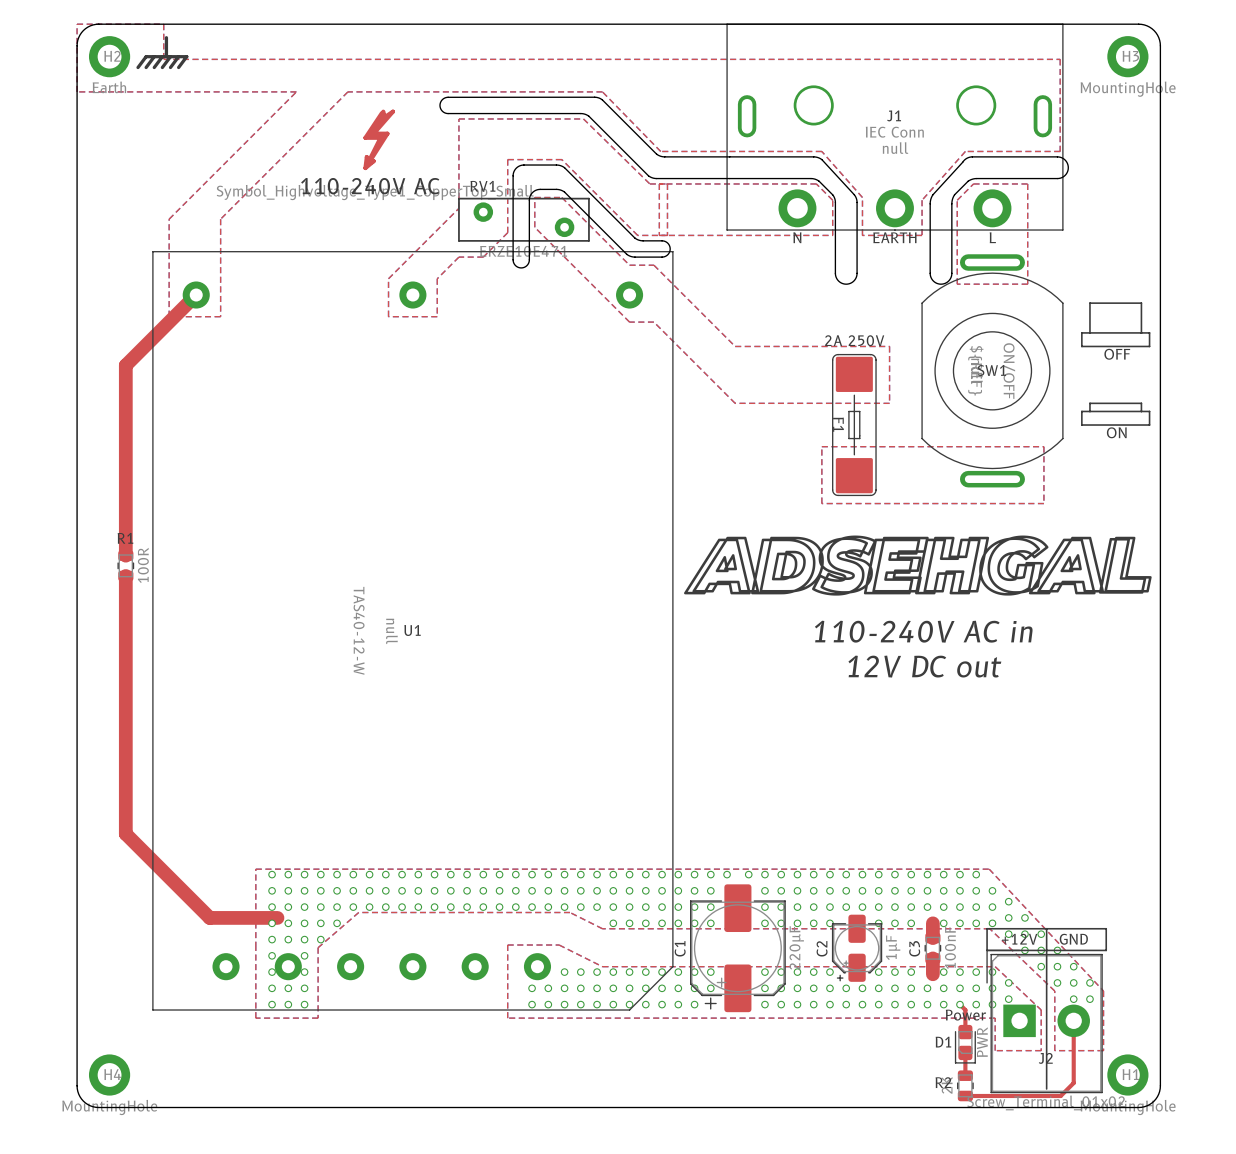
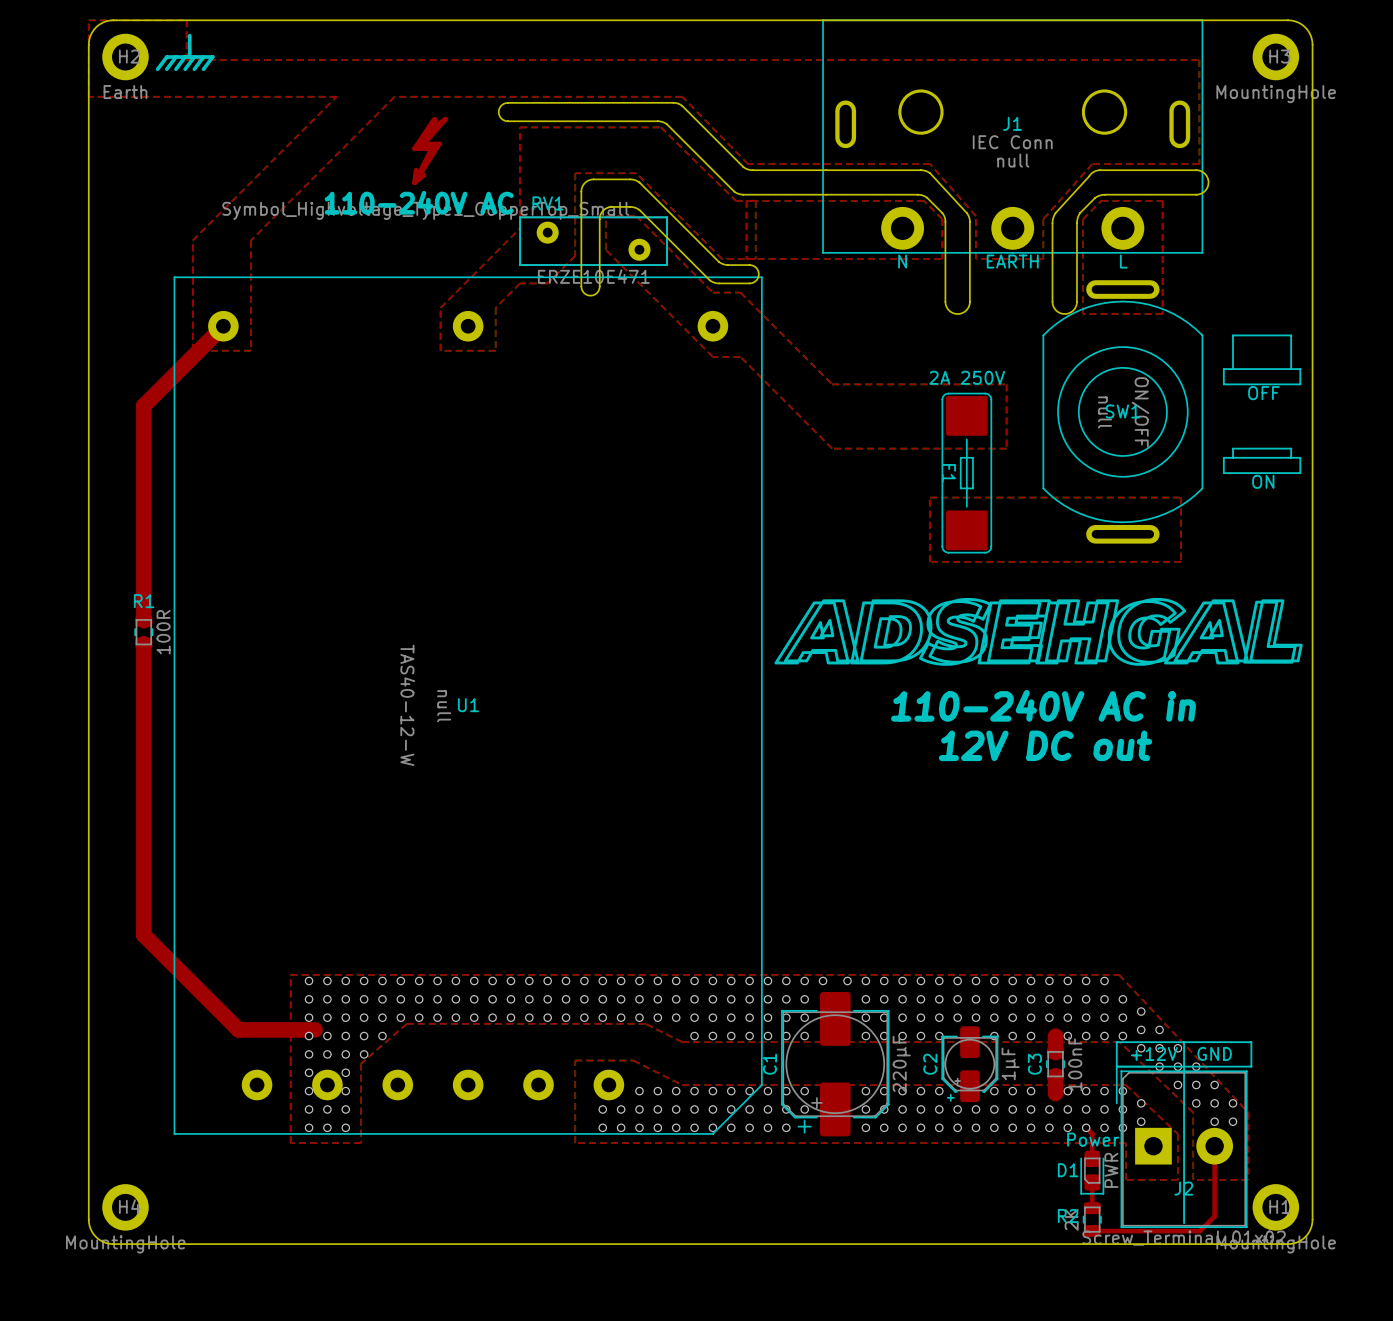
SW1 footprint: [921, 254, 1064, 488] -> [1042, 280, 1204, 544]

